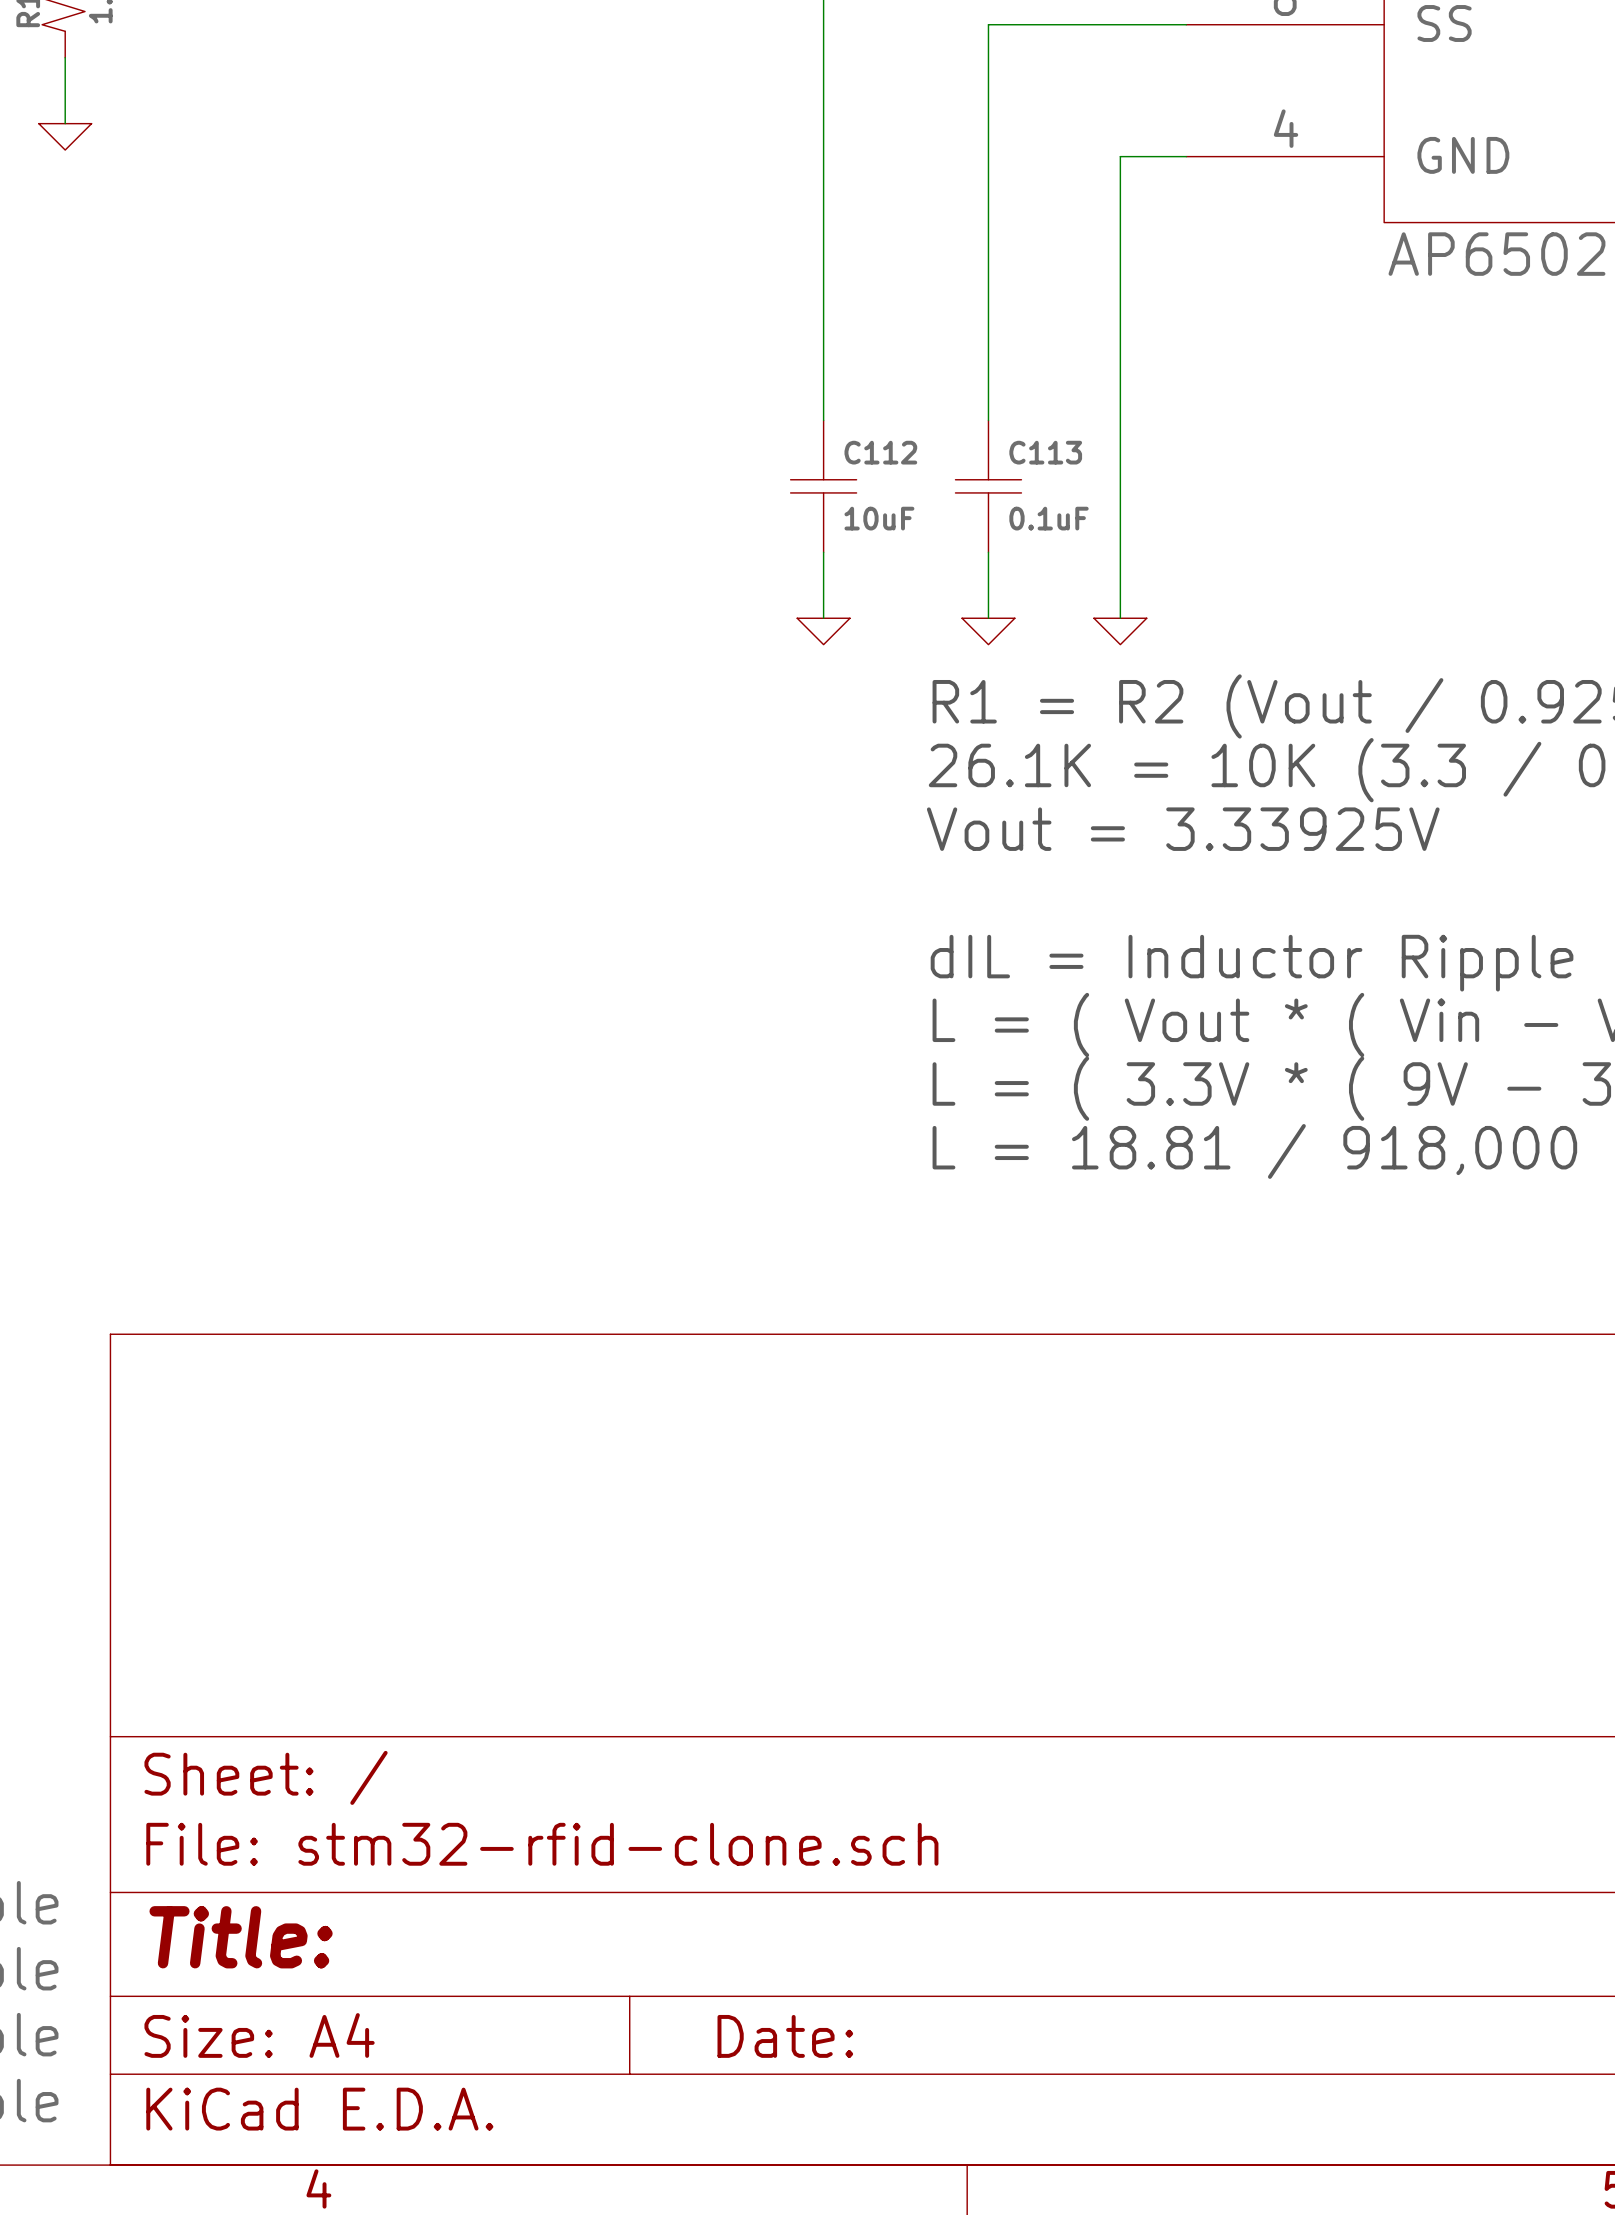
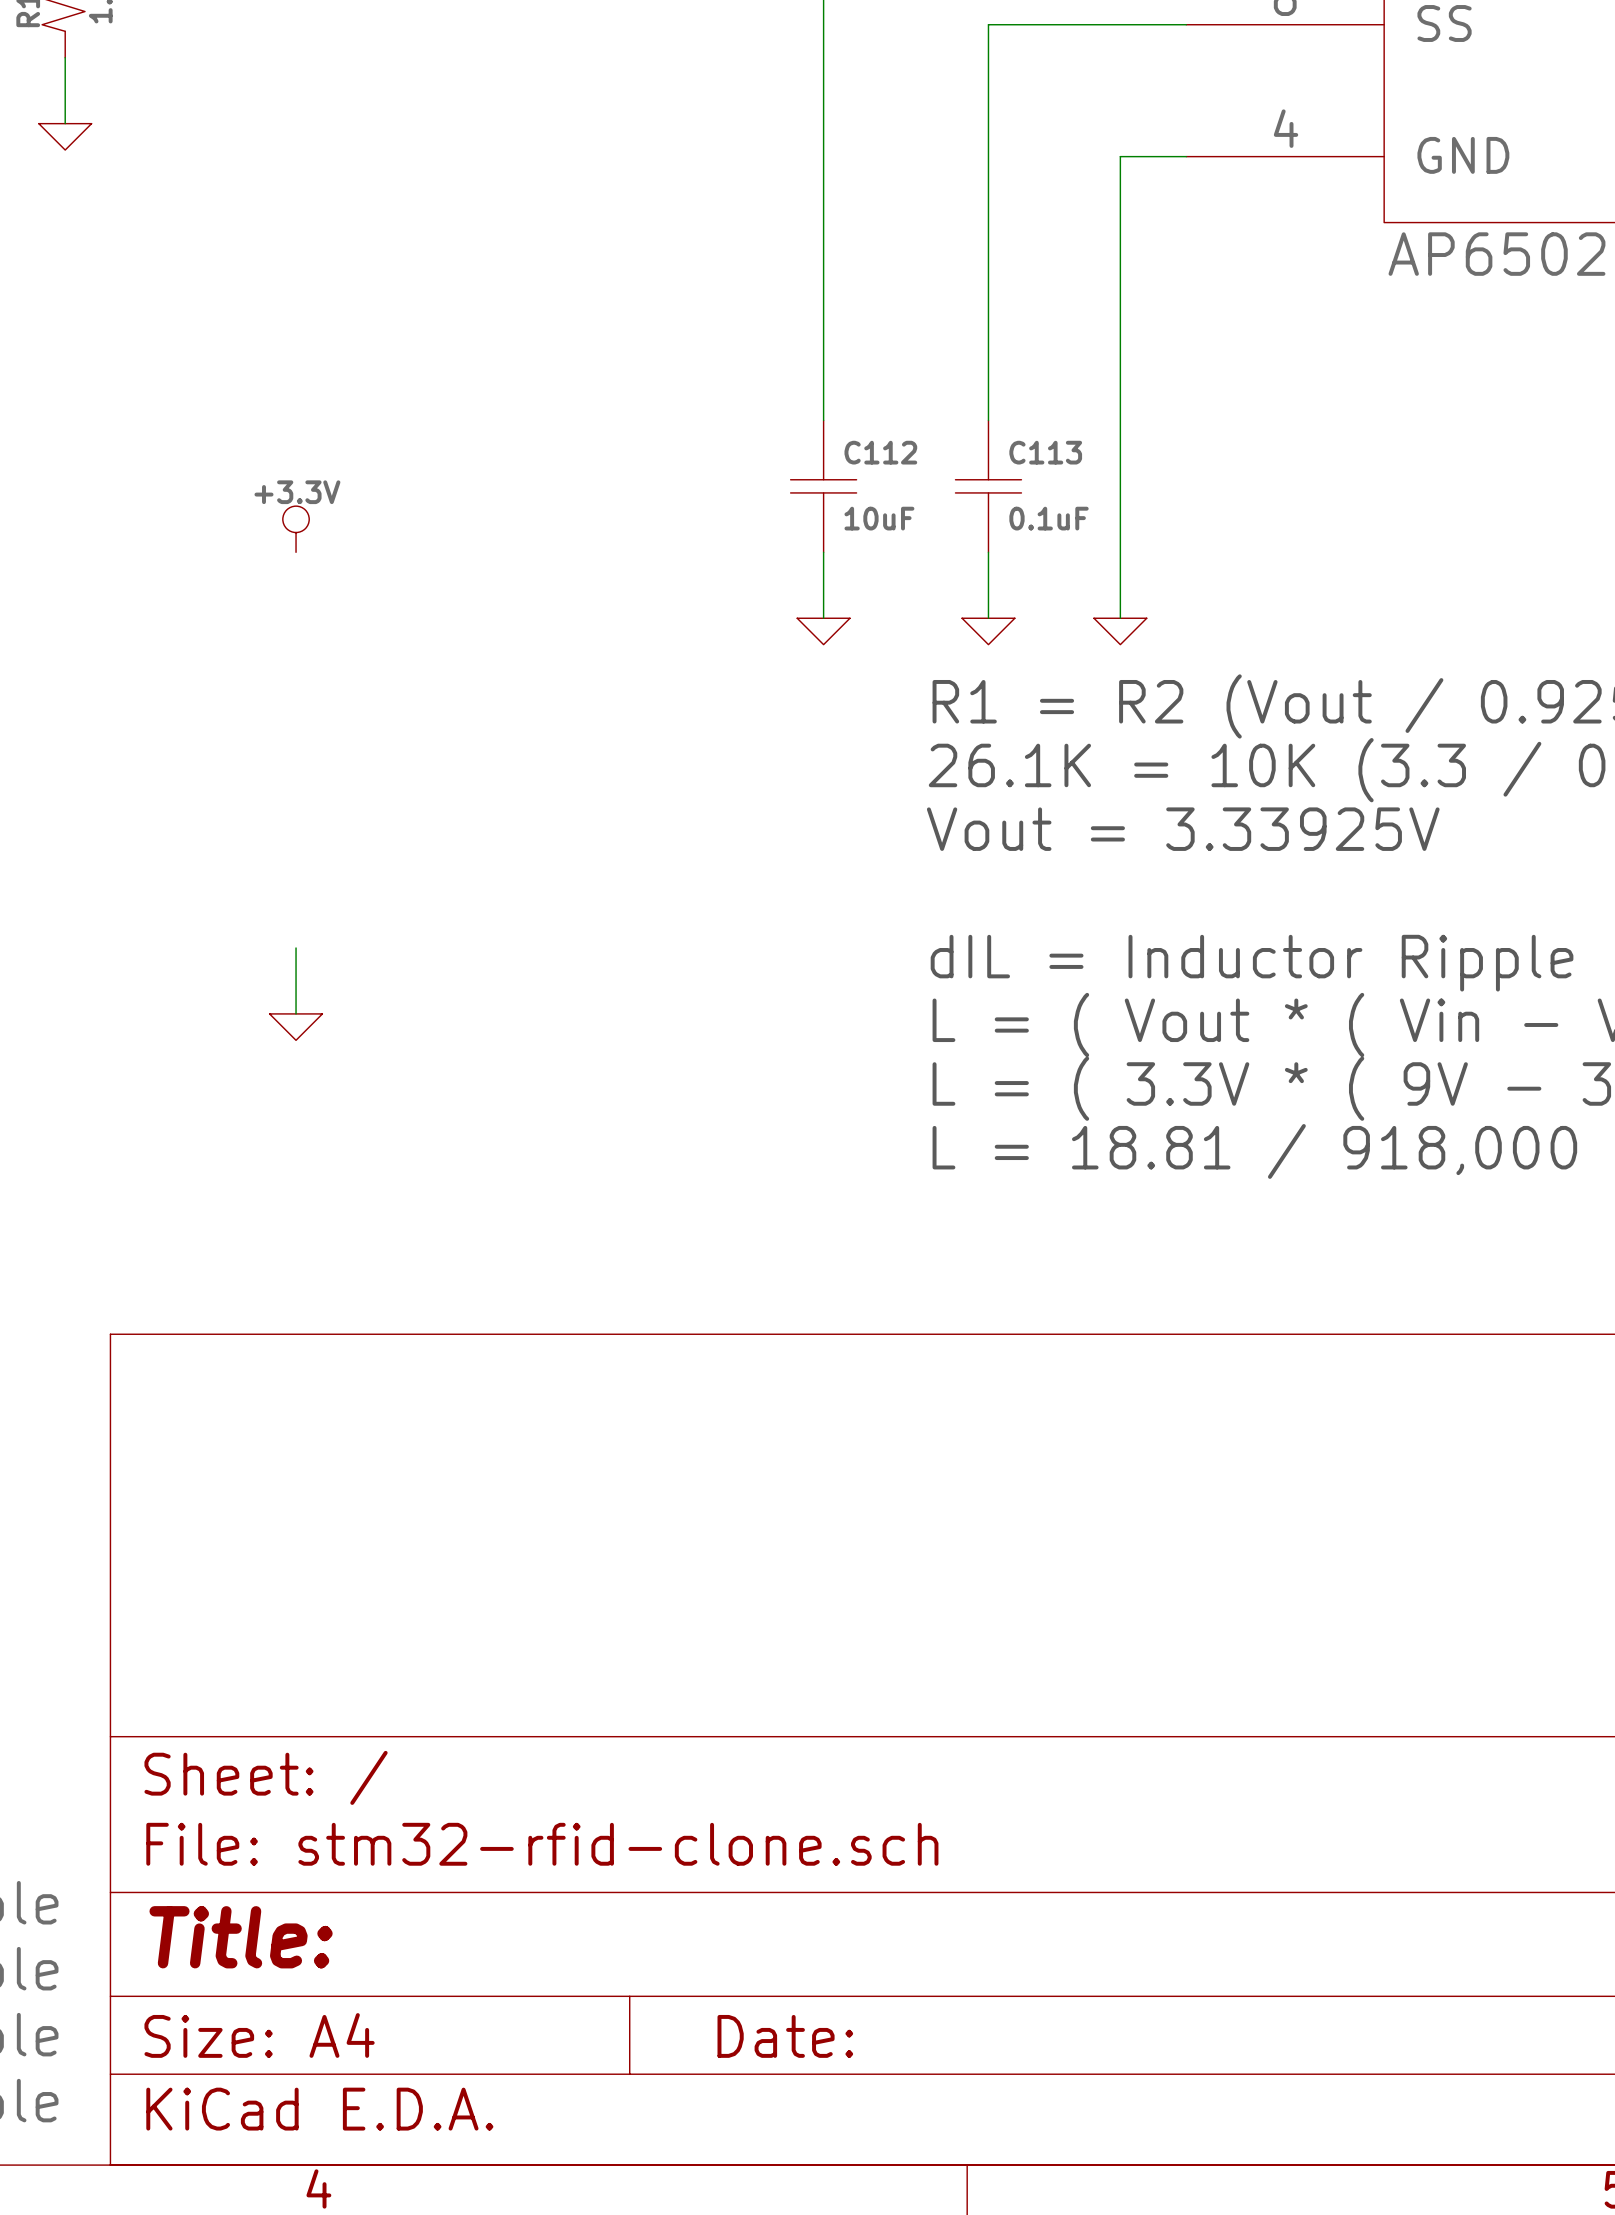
power symbol: none -> +3.3V (296, 529)
wire: none -> (296, 947) (296, 1013)
power symbol: none -> (296, 1027)

